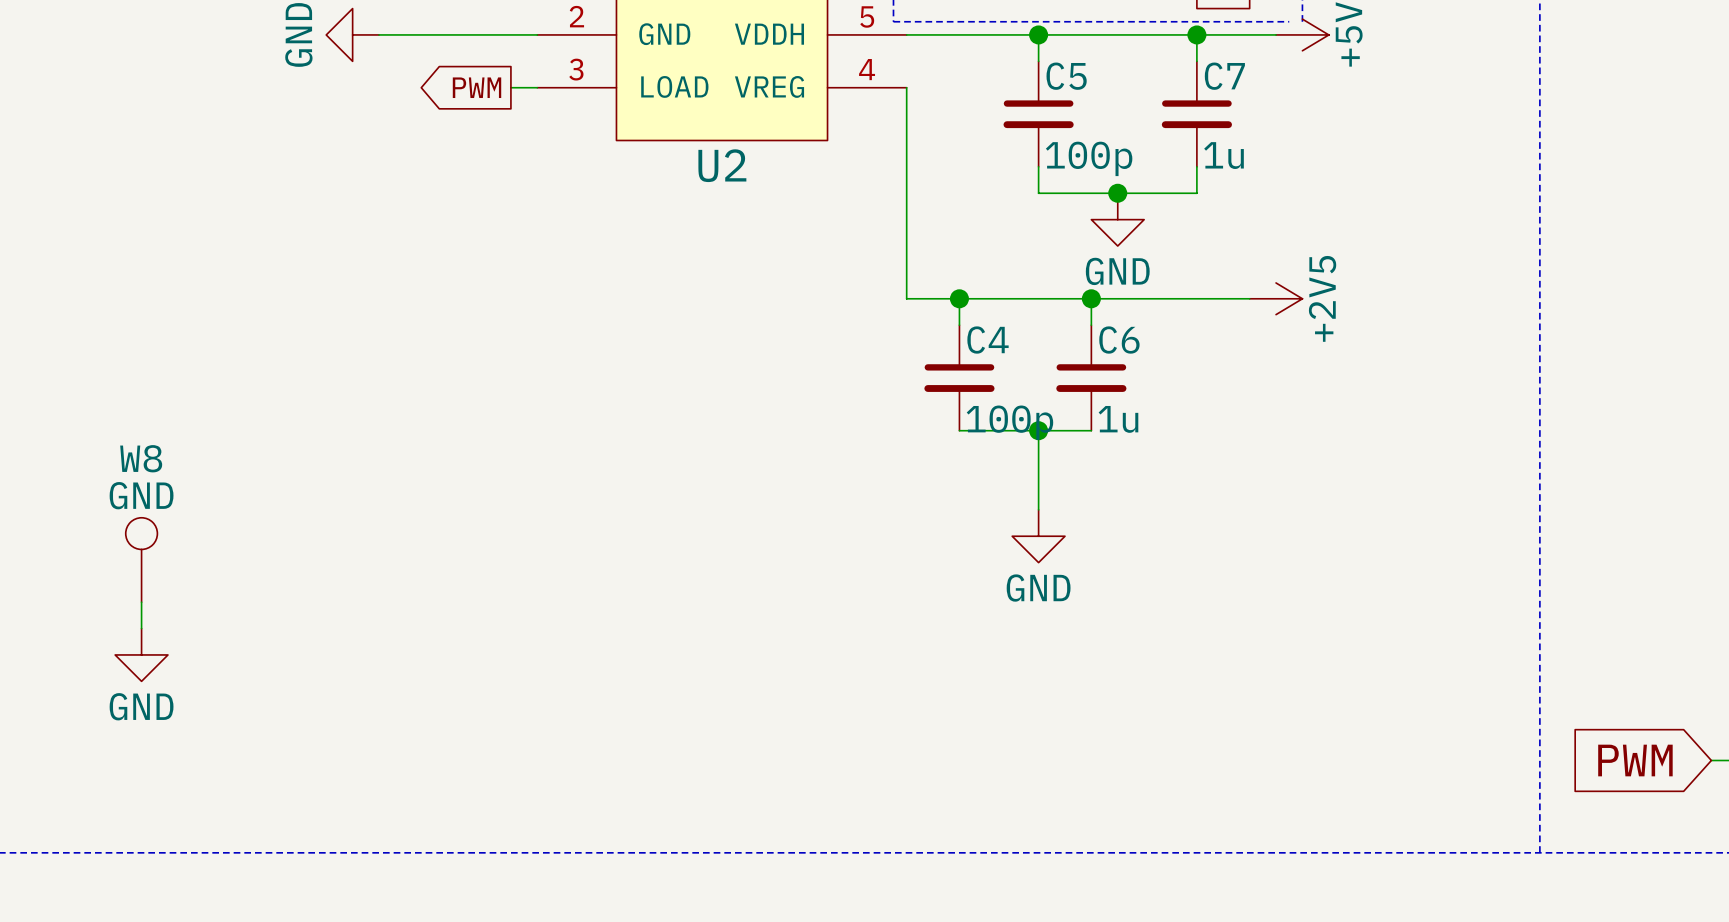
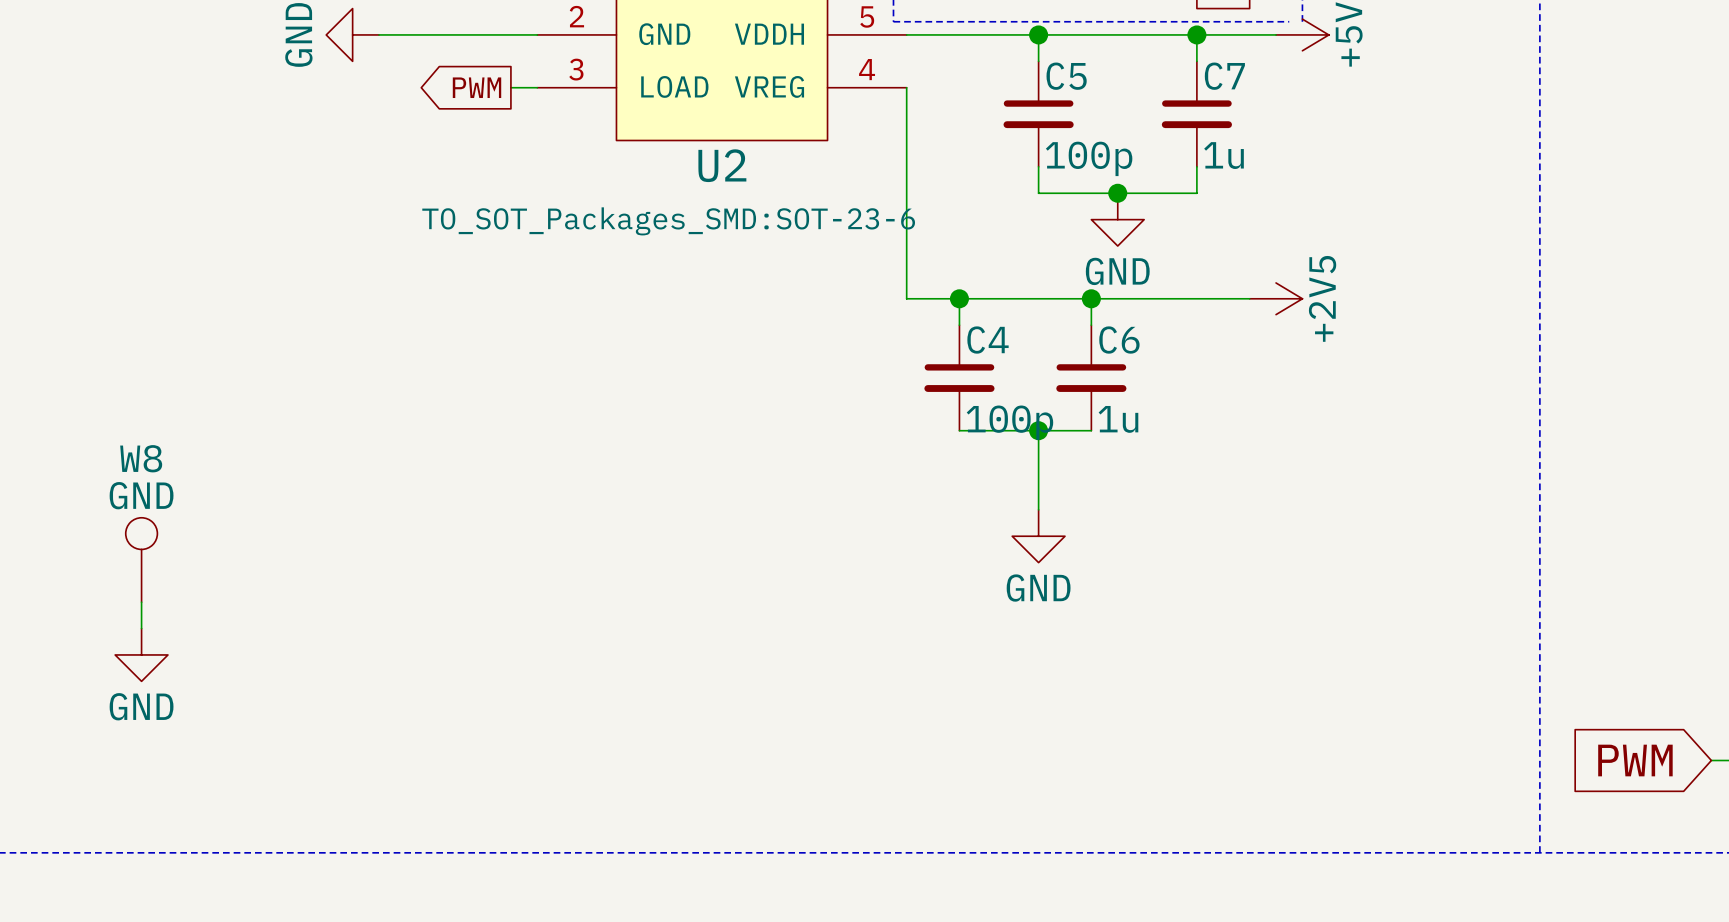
U2 text: none -> TO_SOT_Packages_SMD:SOT-23-6 (668, 221)

